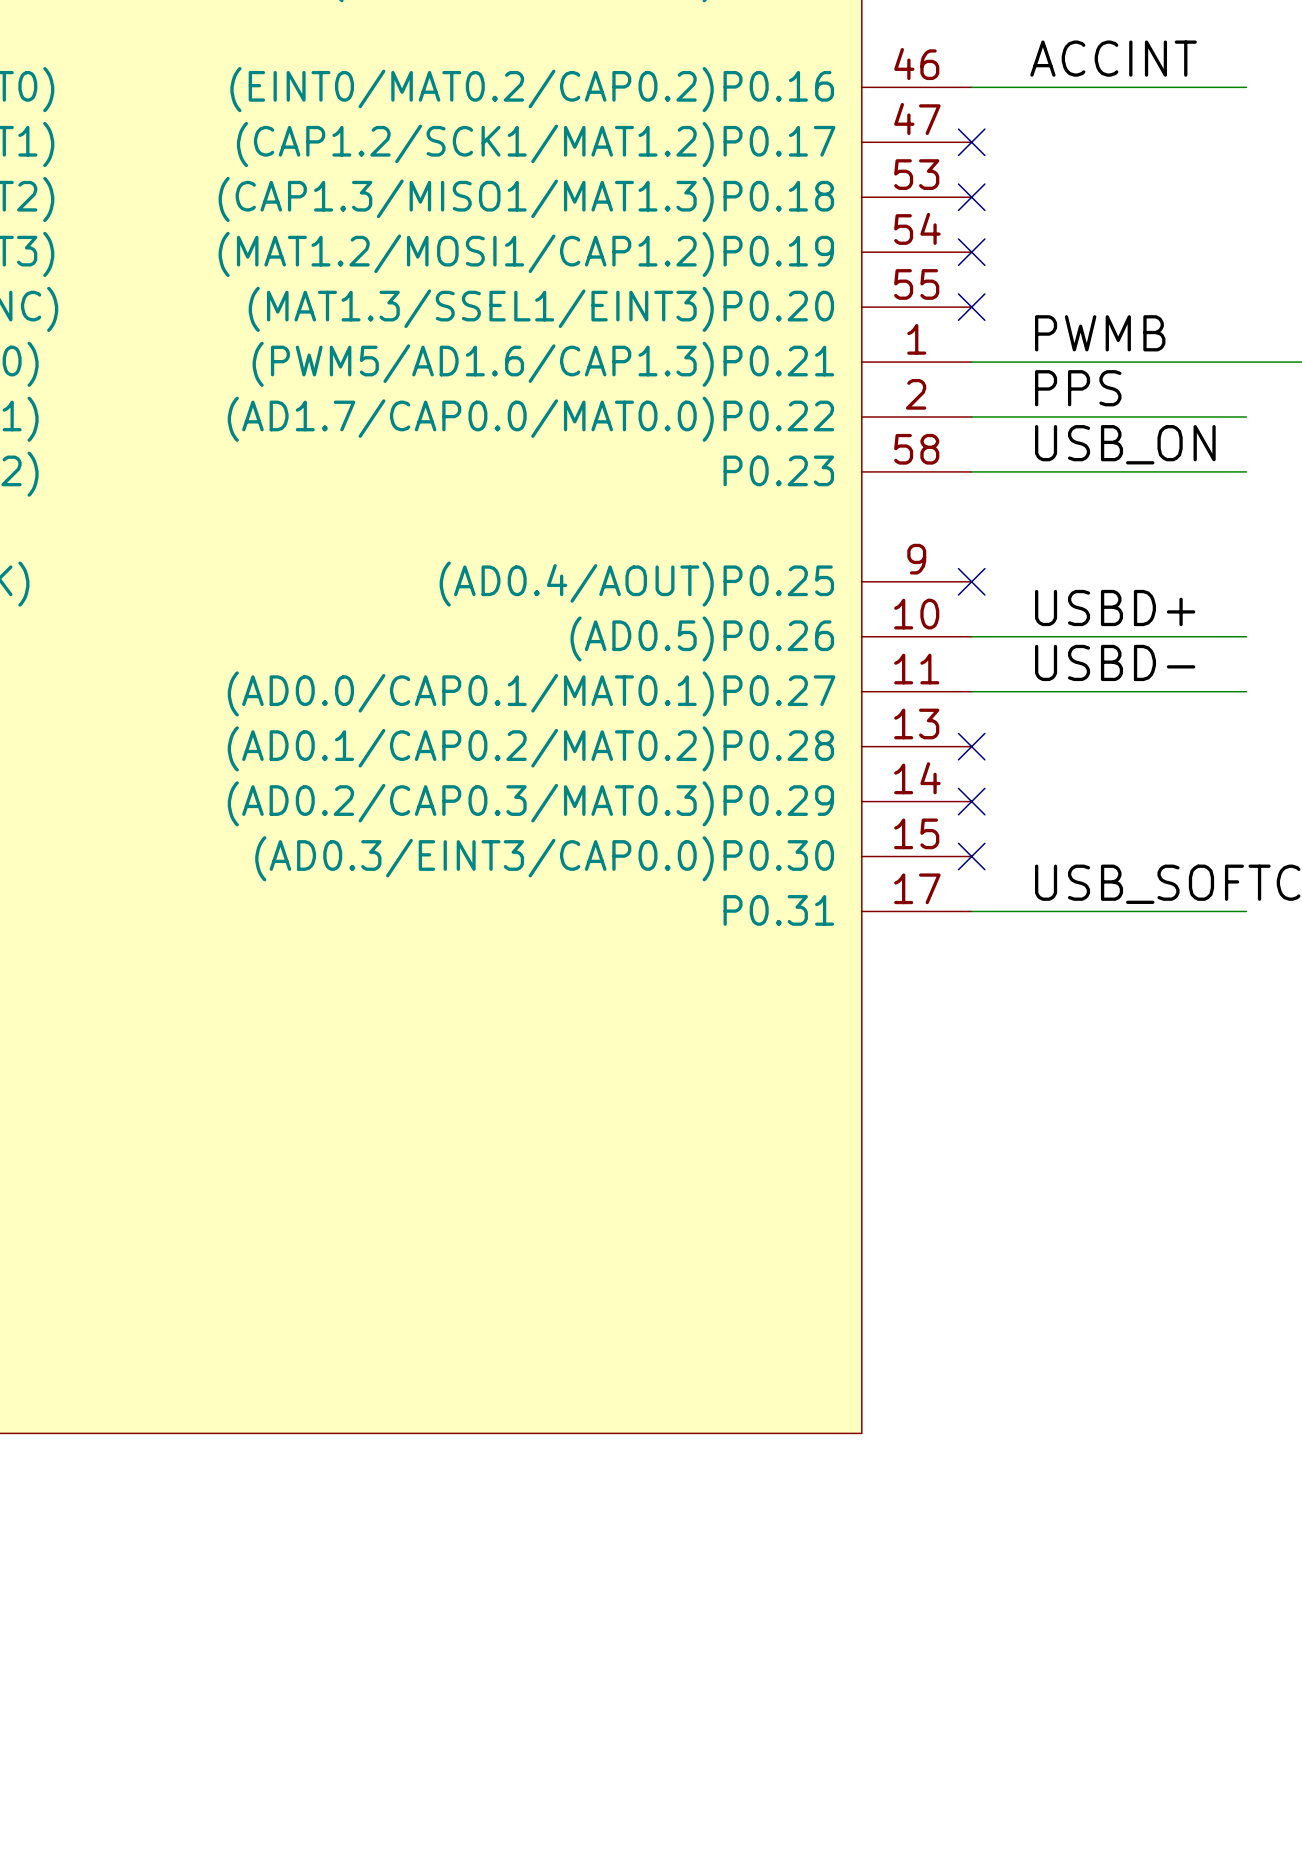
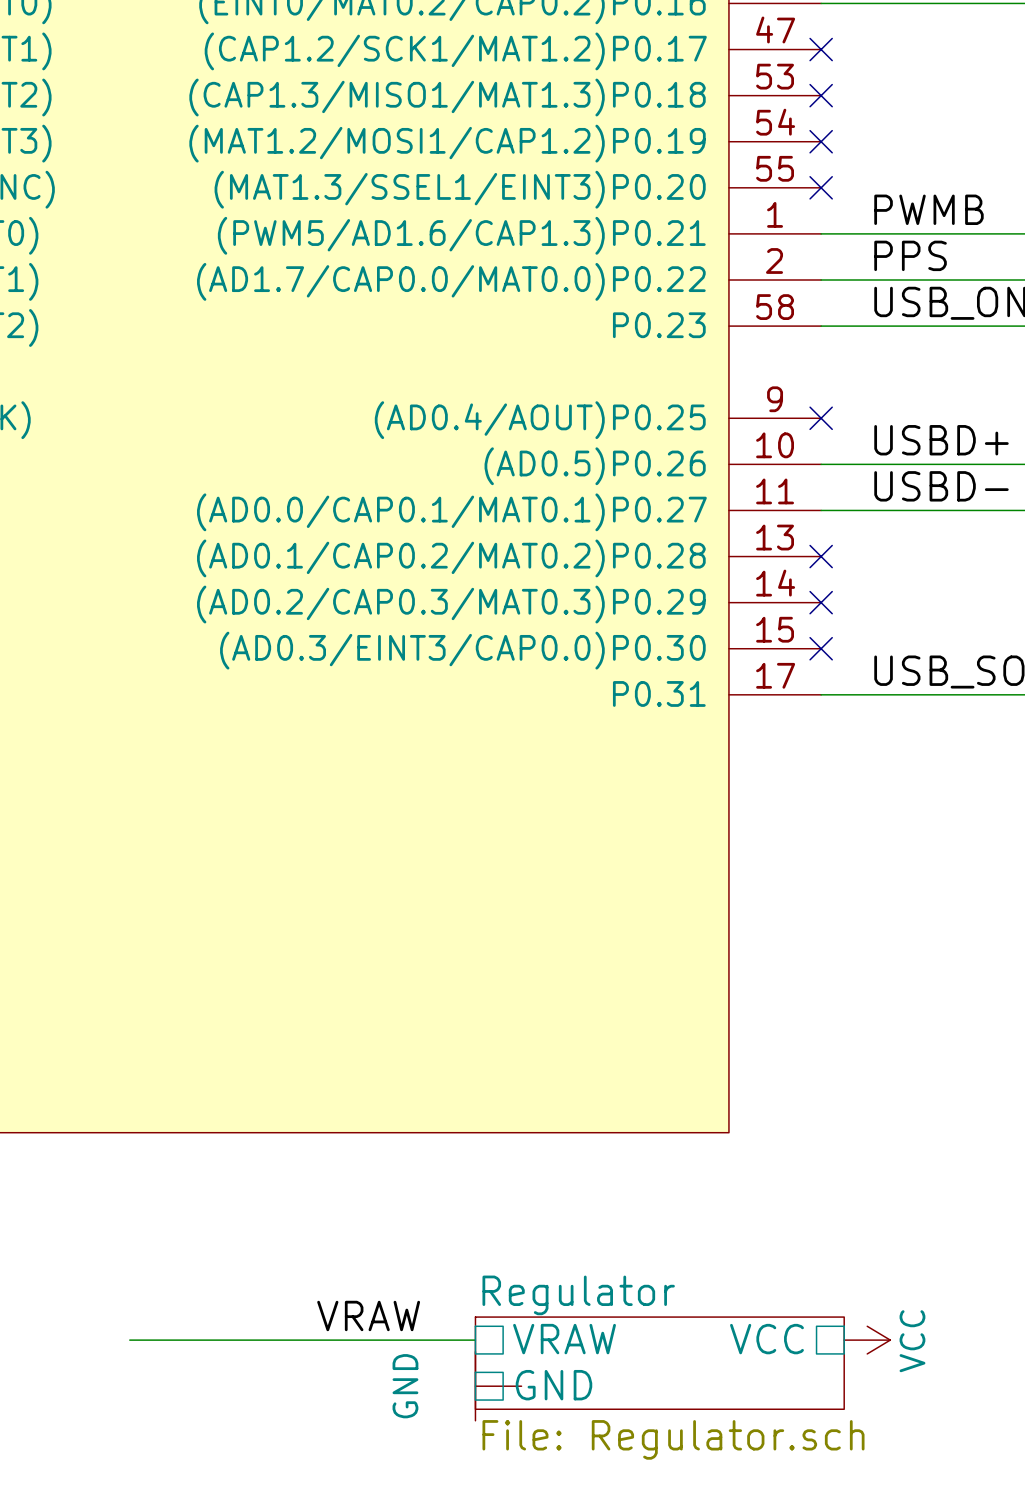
label: none -> VRAW (368, 1315)
sheet pin: none -> VRAW (564, 1339)
sheet pin: none -> VCC (766, 1339)
wire: none -> (129, 1340) (475, 1340)
power symbol: none -> VCC (867, 1340)
sheet Regulator: none -> File: Regulator.sch (659, 1363)
sheet pin: none -> GND (553, 1385)
power symbol: none -> GND (498, 1386)

